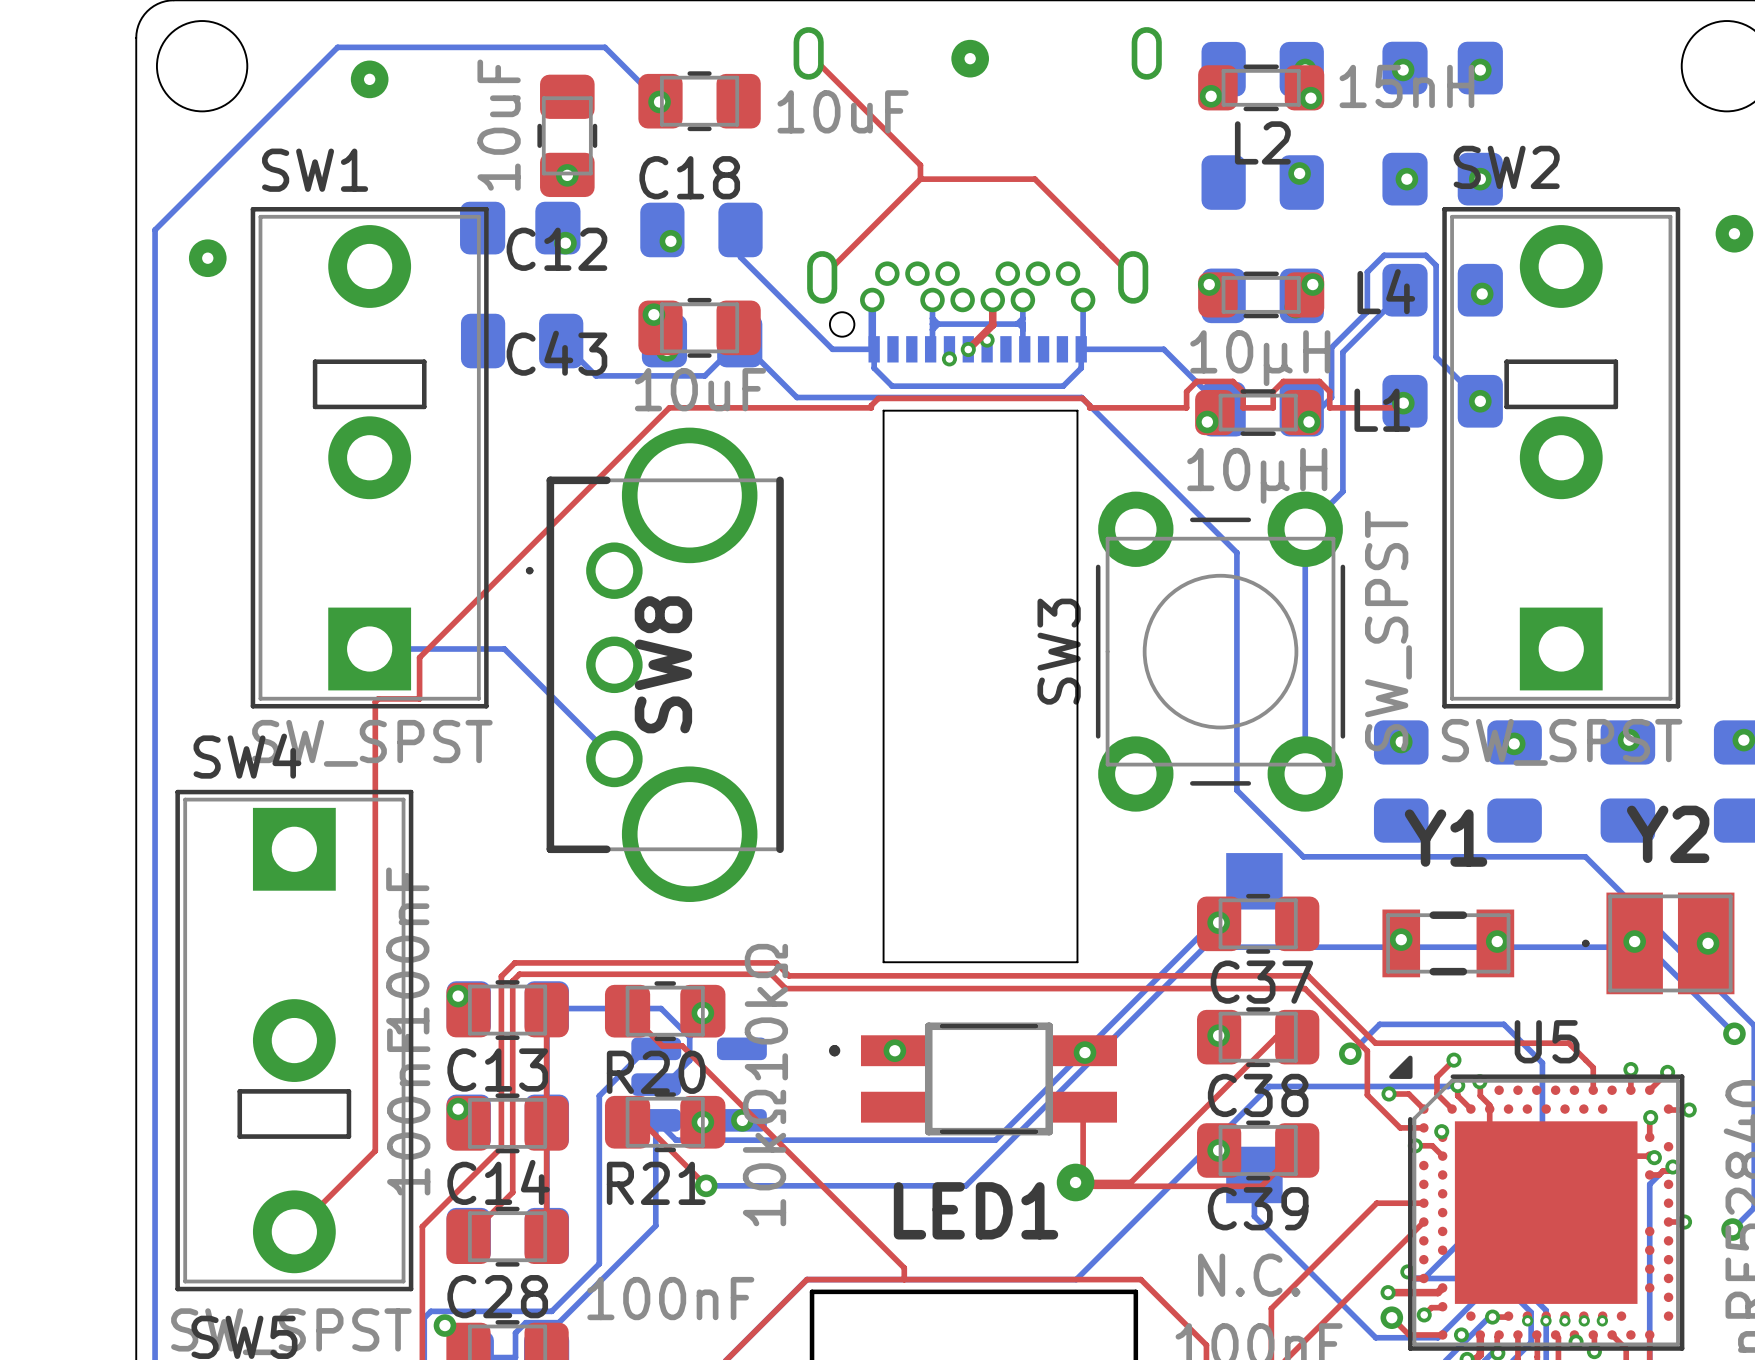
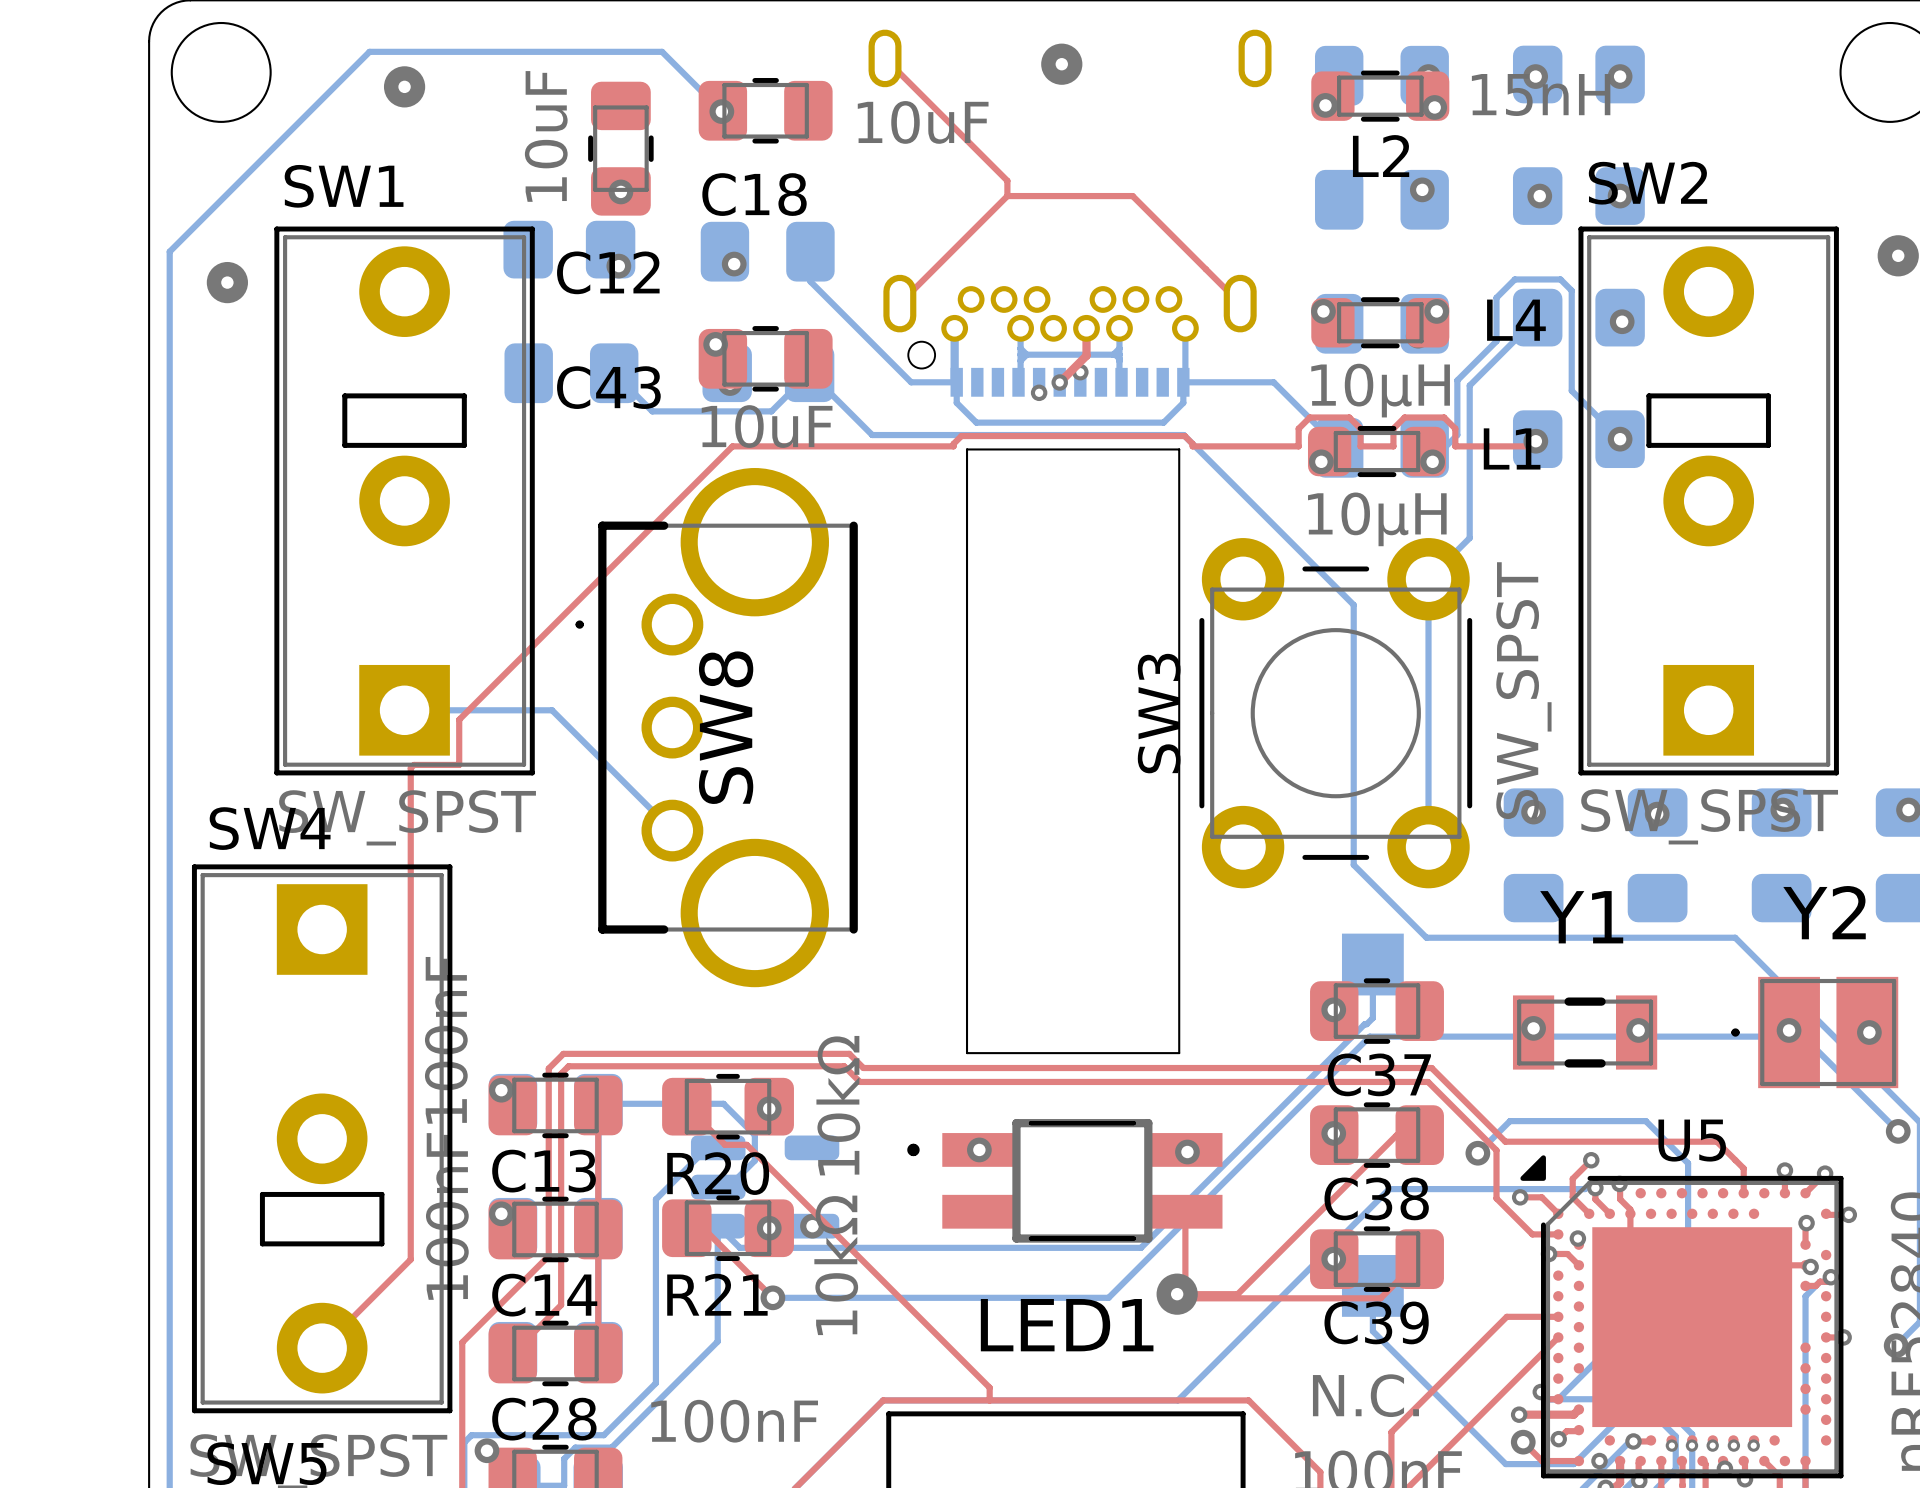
bottom track: (1254, 881) (995, 1140) -> (1372, 964) (1372, 1018) (1366, 1024) (1141, 1247) (1089, 1247)
bottom track: (1251, 947) (1204, 947) (965, 1185) -> (1369, 1036) (1108, 1297) (1057, 1297)

